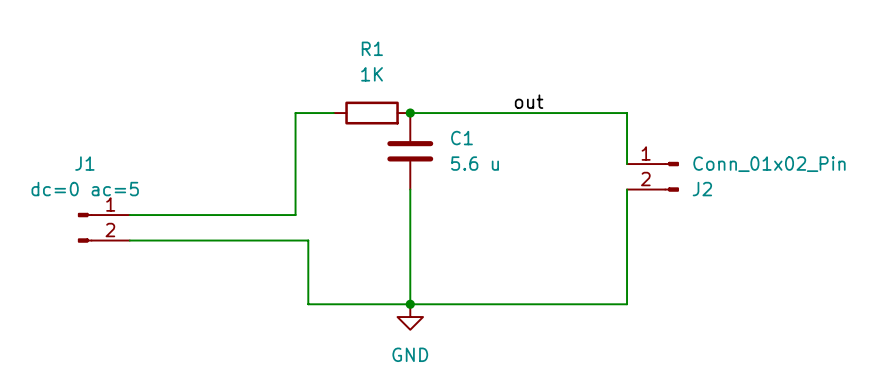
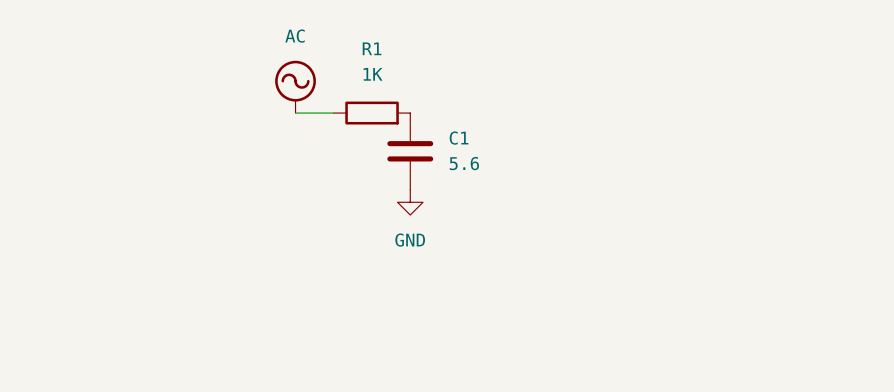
power symbol: none -> AC (295, 86)
label: out (529, 101) -> none
wire: (295, 113) (295, 215) (129, 215) -> none
wire: (410, 113) (627, 113) (627, 164) -> none
junction: (410, 113) -> none
C1 value: 5.6 u (475, 163) -> 5.6 (464, 163)
J2: Conn_01x02_Pin (652, 176) -> none
wire: (410, 189) (410, 304) -> none
wire: (627, 189) (627, 304) (308, 304) (308, 240) (129, 240) -> none
J1: dc=0 ac=5 (103, 227) -> none
junction: (410, 304) -> none
power symbol position: GND (410, 317) -> GND (410, 202)

